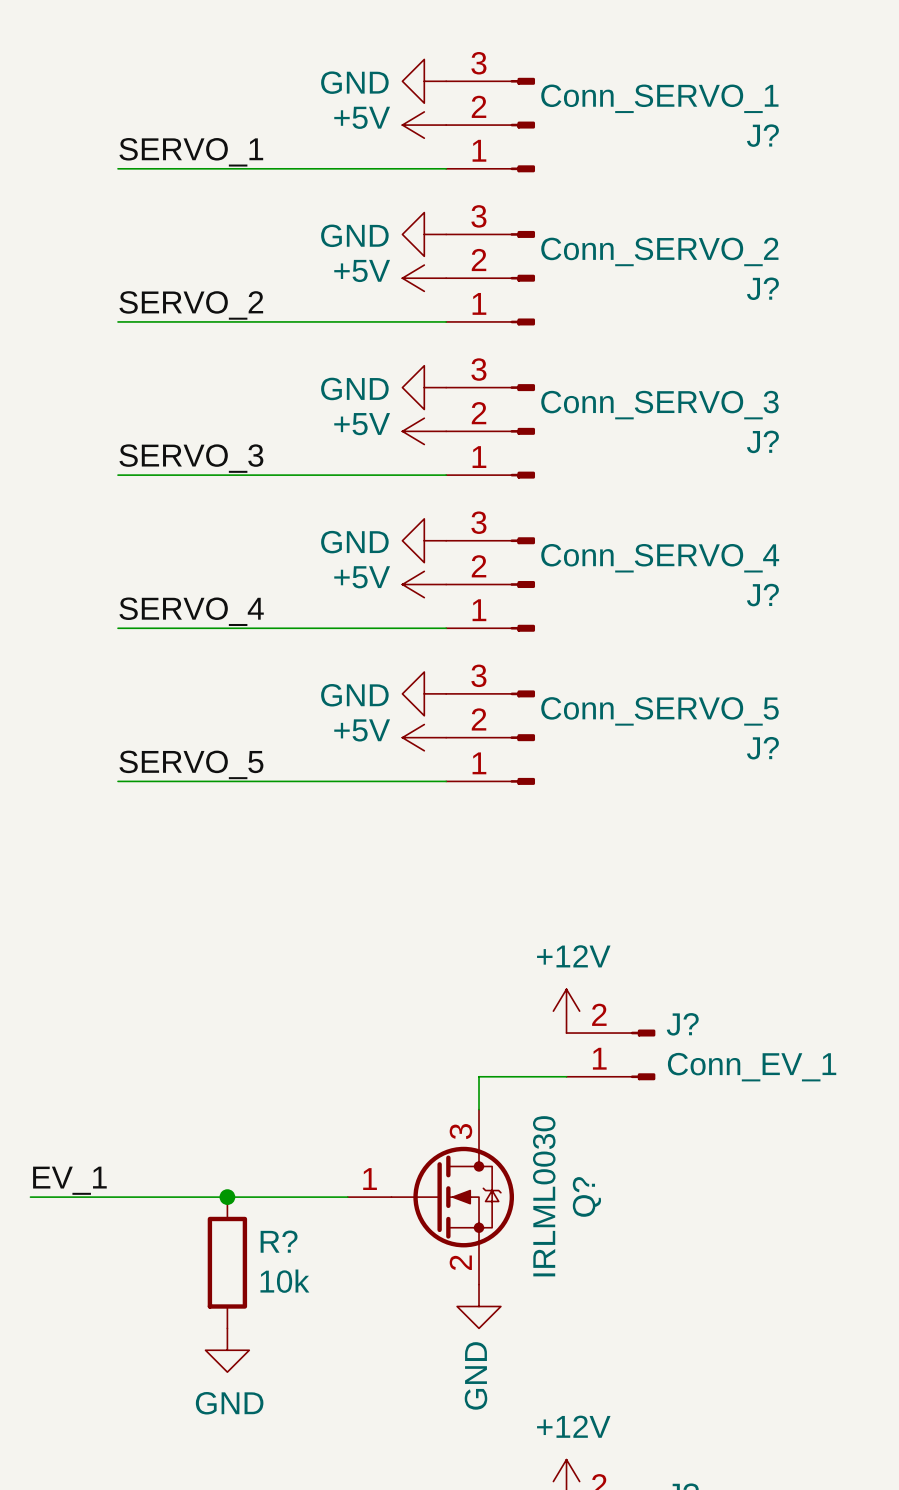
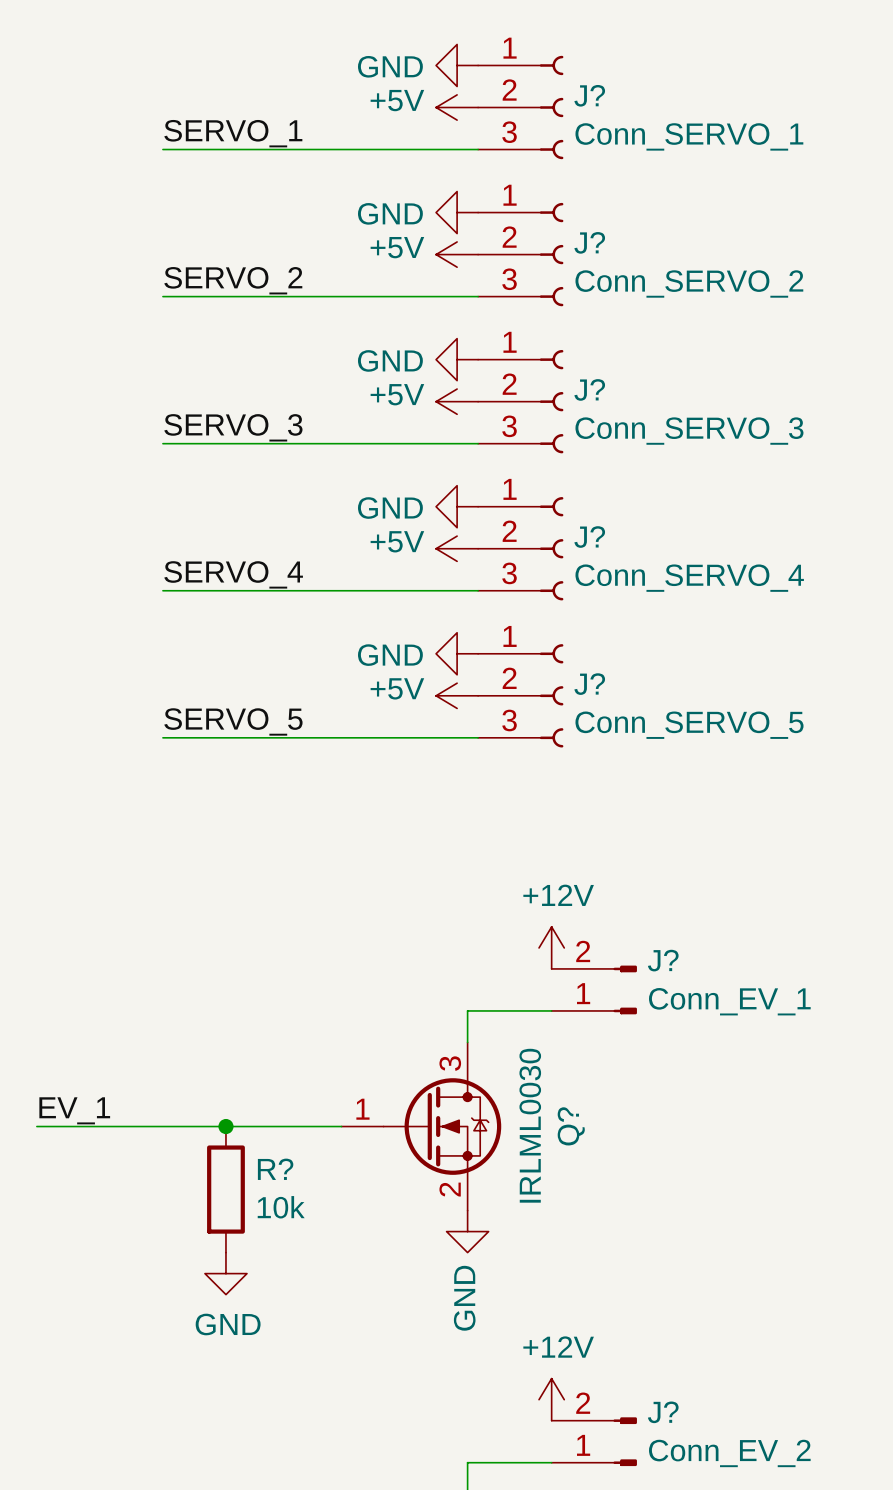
power symbol position: GND (424, 81) -> GND (457, 65)
power symbol position: +5V (424, 125) -> +5V (457, 107)
J?: Conn_SERVO_1 (490, 125) -> none
J?: none -> Conn_SERVO_1 (520, 107)
label position: SERVO_1 (191, 152) -> SERVO_1 (233, 133)
wire: (118, 168) (446, 168) -> (162, 149) (478, 149)
power symbol position: GND (424, 234) -> GND (457, 212)
power symbol position: +5V (424, 278) -> +5V (457, 254)
J?: Conn_SERVO_2 (490, 278) -> none
J?: none -> Conn_SERVO_2 (520, 254)
label position: SERVO_2 (191, 305) -> SERVO_2 (233, 280)
wire: (118, 321) (446, 321) -> (162, 296) (478, 296)
power symbol position: GND (424, 387) -> GND (457, 359)
power symbol position: +5V (424, 431) -> +5V (457, 401)
J?: Conn_SERVO_3 (490, 431) -> none
J?: none -> Conn_SERVO_3 (520, 401)
label position: SERVO_3 (191, 458) -> SERVO_3 (233, 427)
wire: (118, 475) (446, 475) -> (162, 443) (478, 443)
power symbol position: GND (424, 540) -> GND (457, 506)
power symbol position: +5V (424, 584) -> +5V (457, 548)
J?: Conn_SERVO_4 (490, 584) -> none
J?: none -> Conn_SERVO_4 (520, 548)
label position: SERVO_4 (191, 611) -> SERVO_4 (233, 574)
wire: (118, 628) (446, 628) -> (162, 590) (478, 590)
power symbol position: GND (424, 693) -> GND (457, 653)
power symbol position: +5V (424, 737) -> +5V (457, 695)
J?: Conn_SERVO_5 (490, 737) -> none
J?: none -> Conn_SERVO_5 (520, 695)
label position: SERVO_5 (191, 764) -> SERVO_5 (233, 721)
wire: (118, 781) (446, 781) -> (162, 737) (478, 737)

